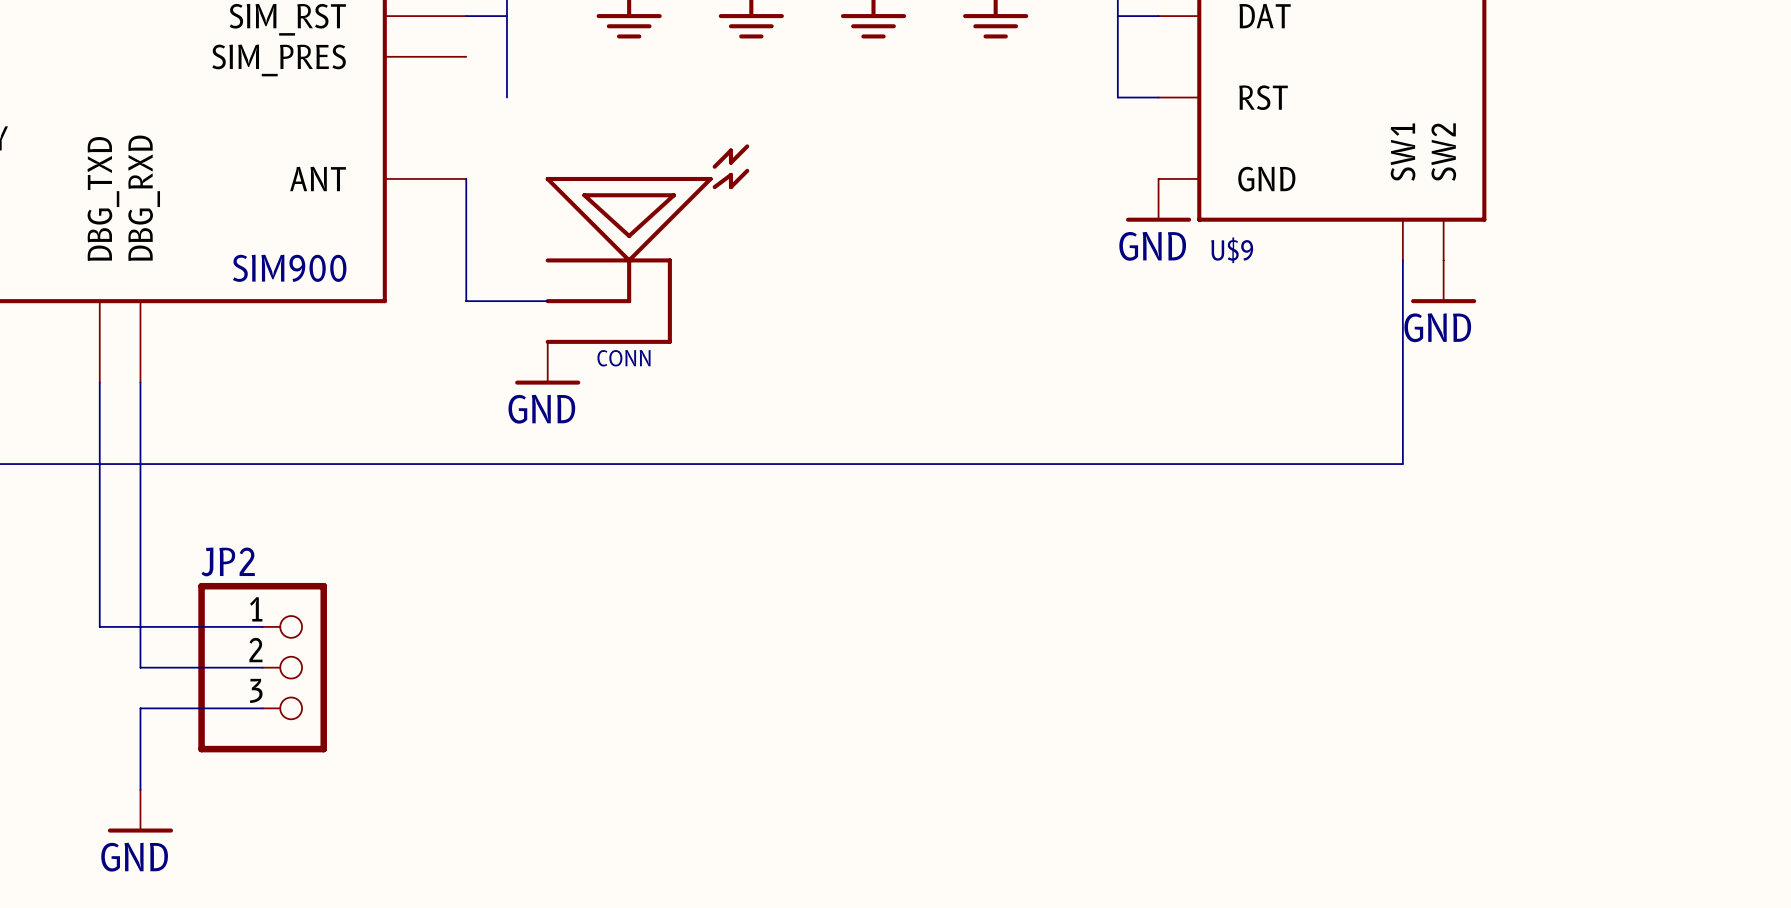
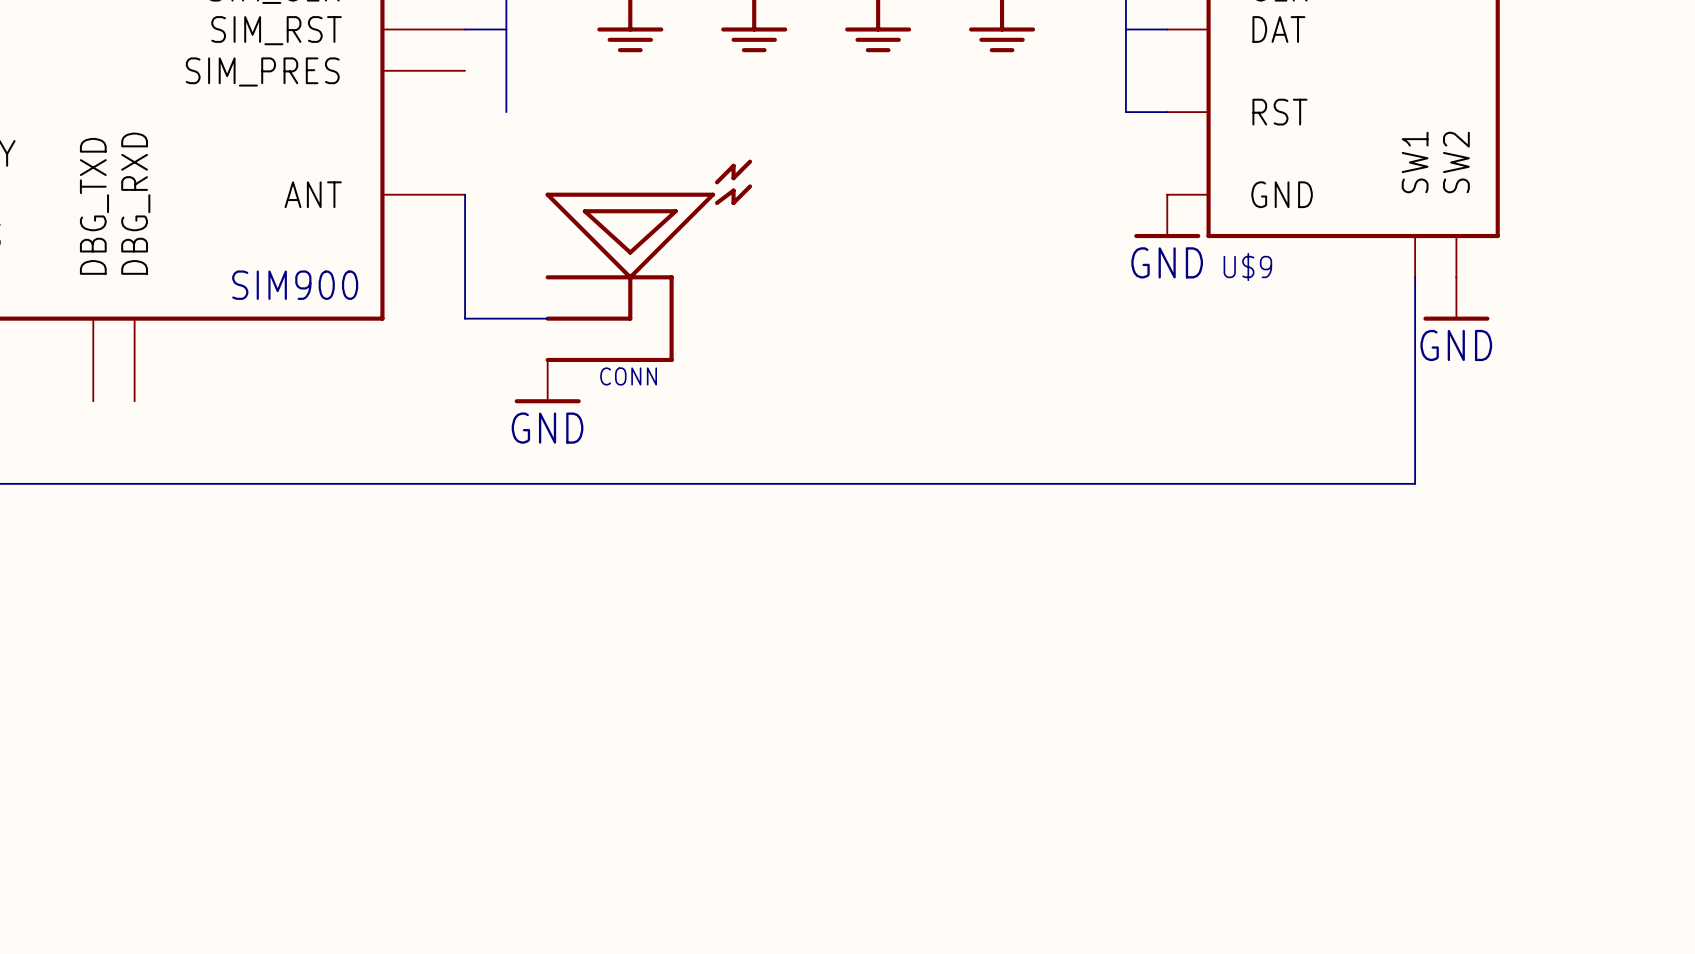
wire: (99, 382) (99, 626) (262, 626) -> none
wire: (140, 382) (140, 667) (262, 667) -> none
JP2: (262, 667) -> none
wire: (262, 708) (140, 708) (140, 789) -> none
power symbol: GND (140, 811) -> none

